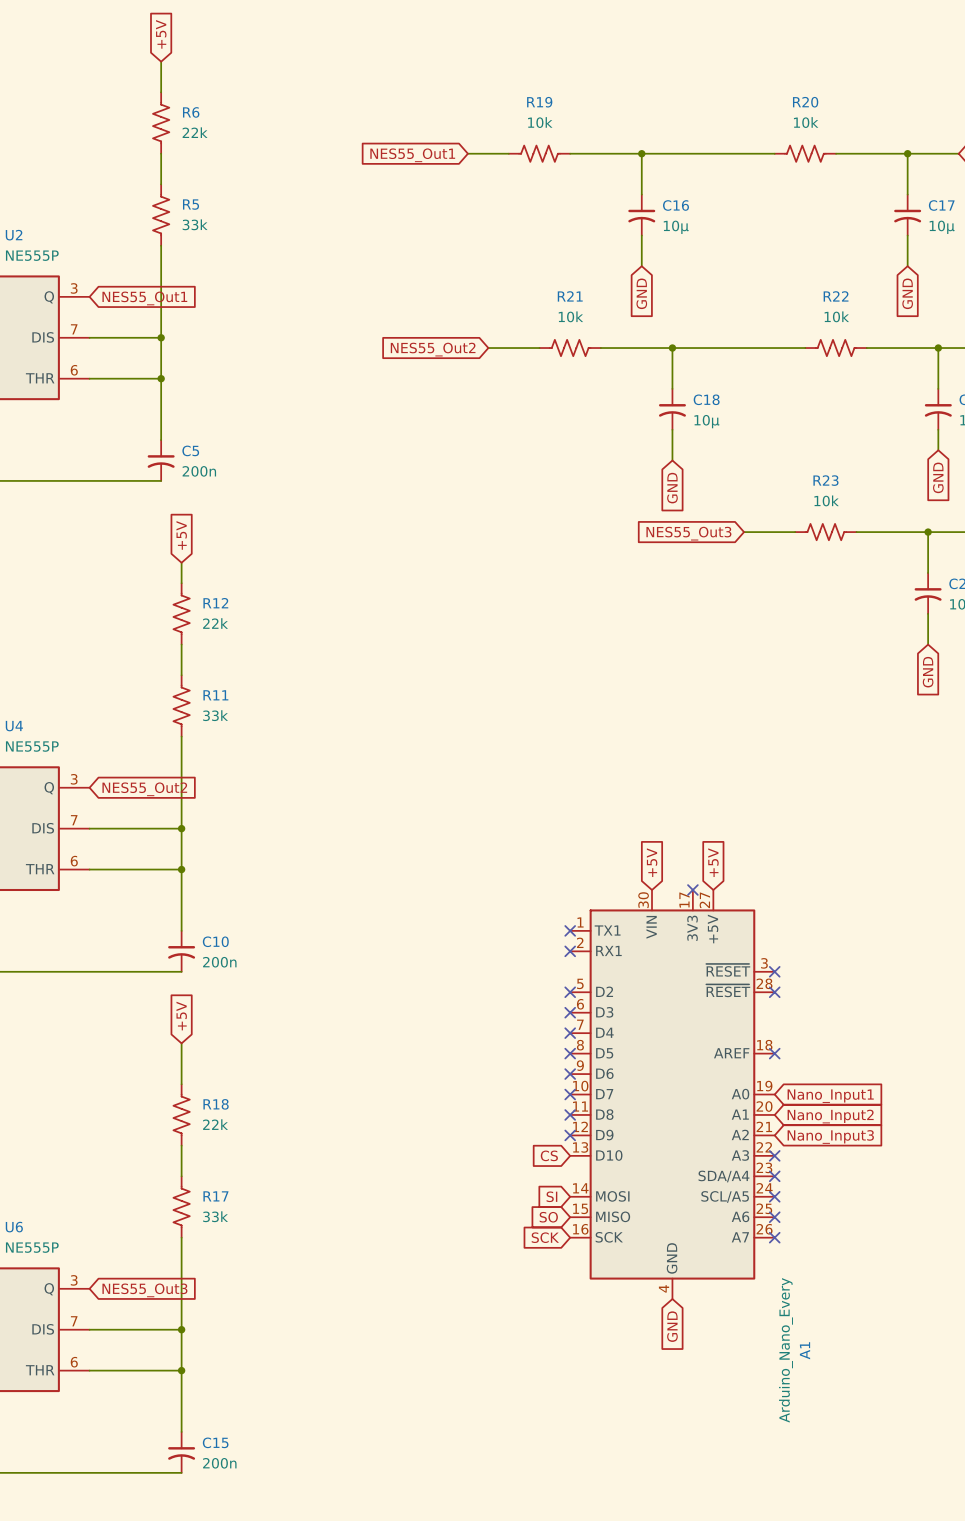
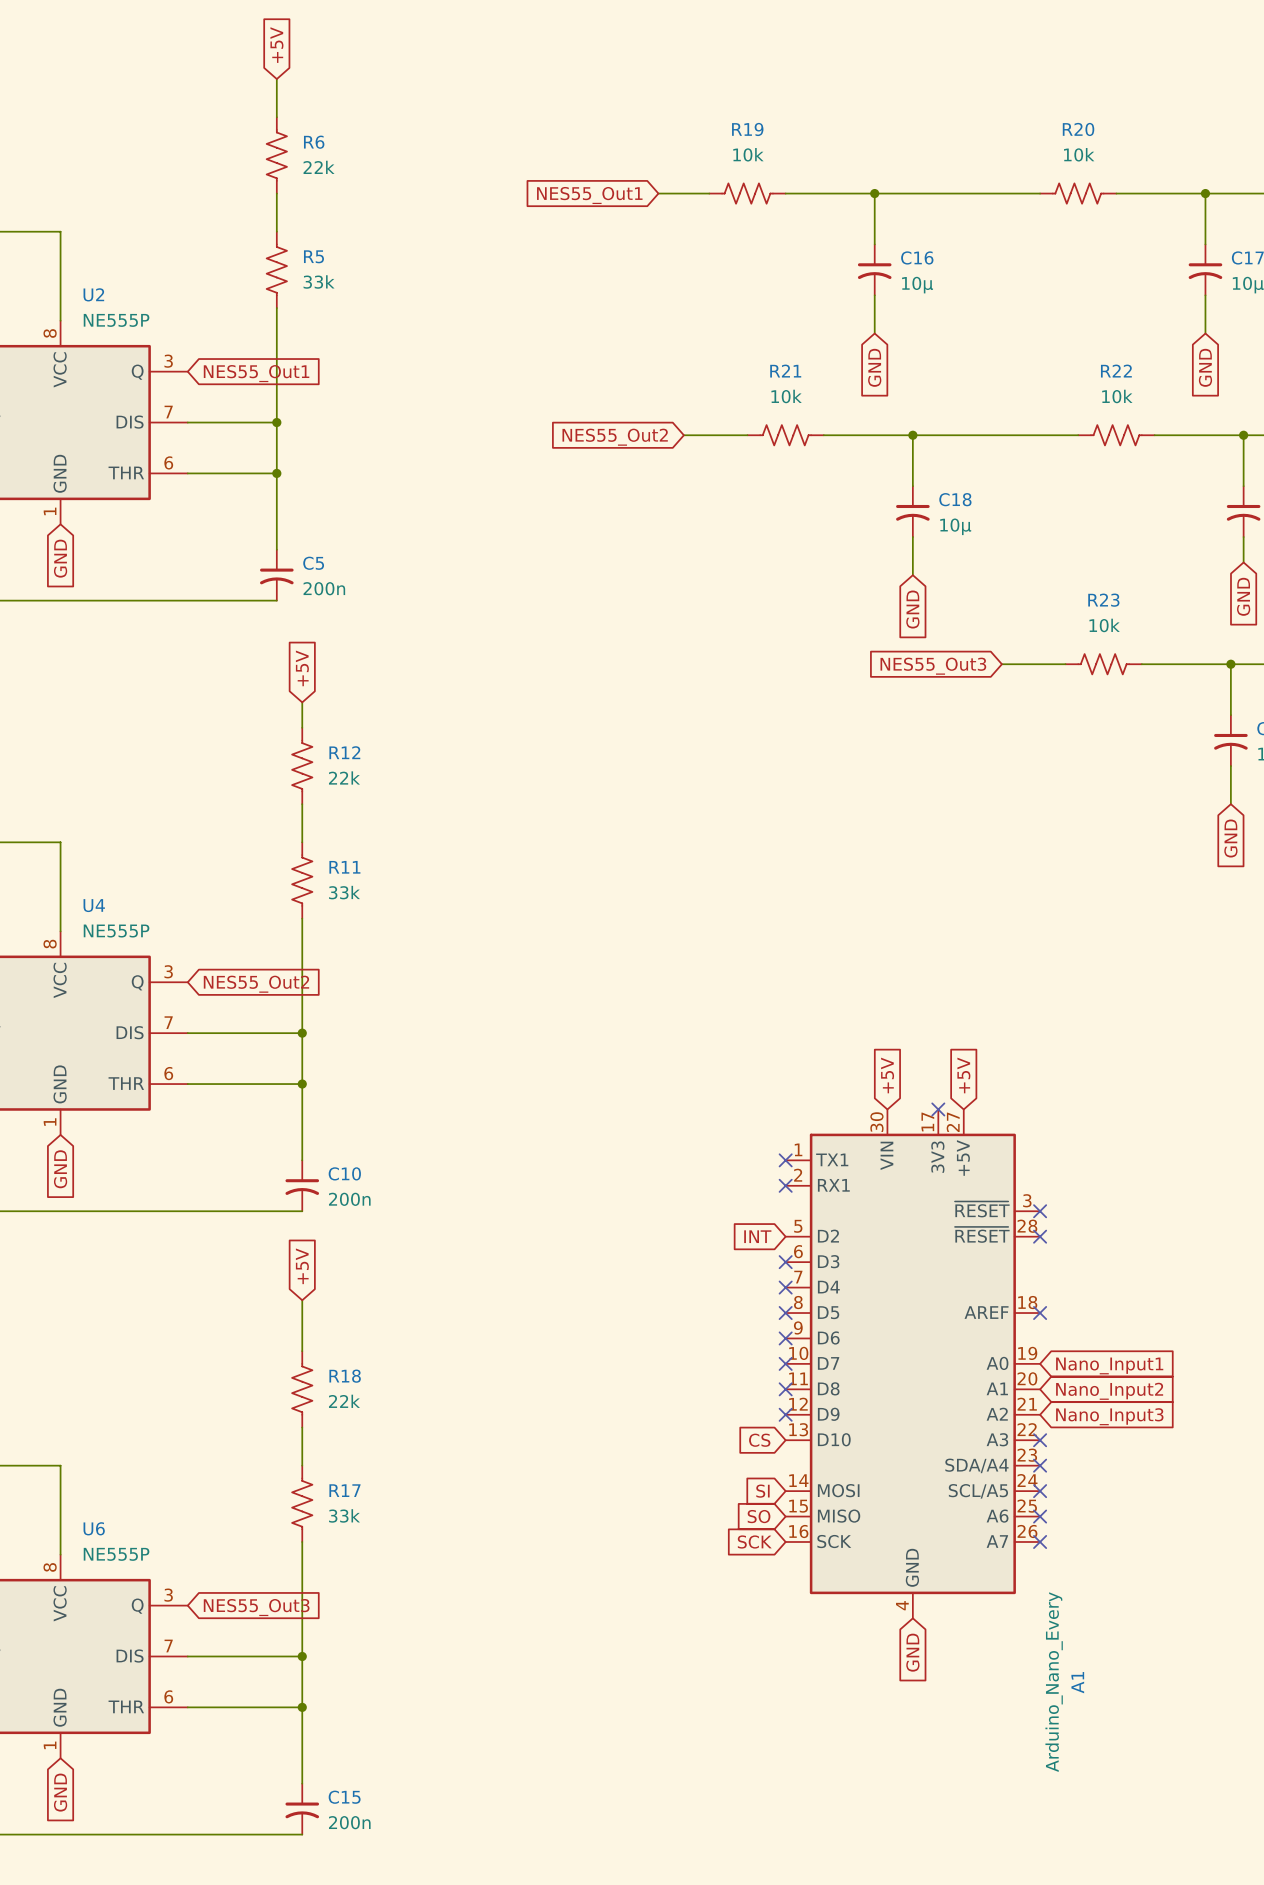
global label: none -> INT (757, 1236)
no-connect mark: (570, 992) -> none

